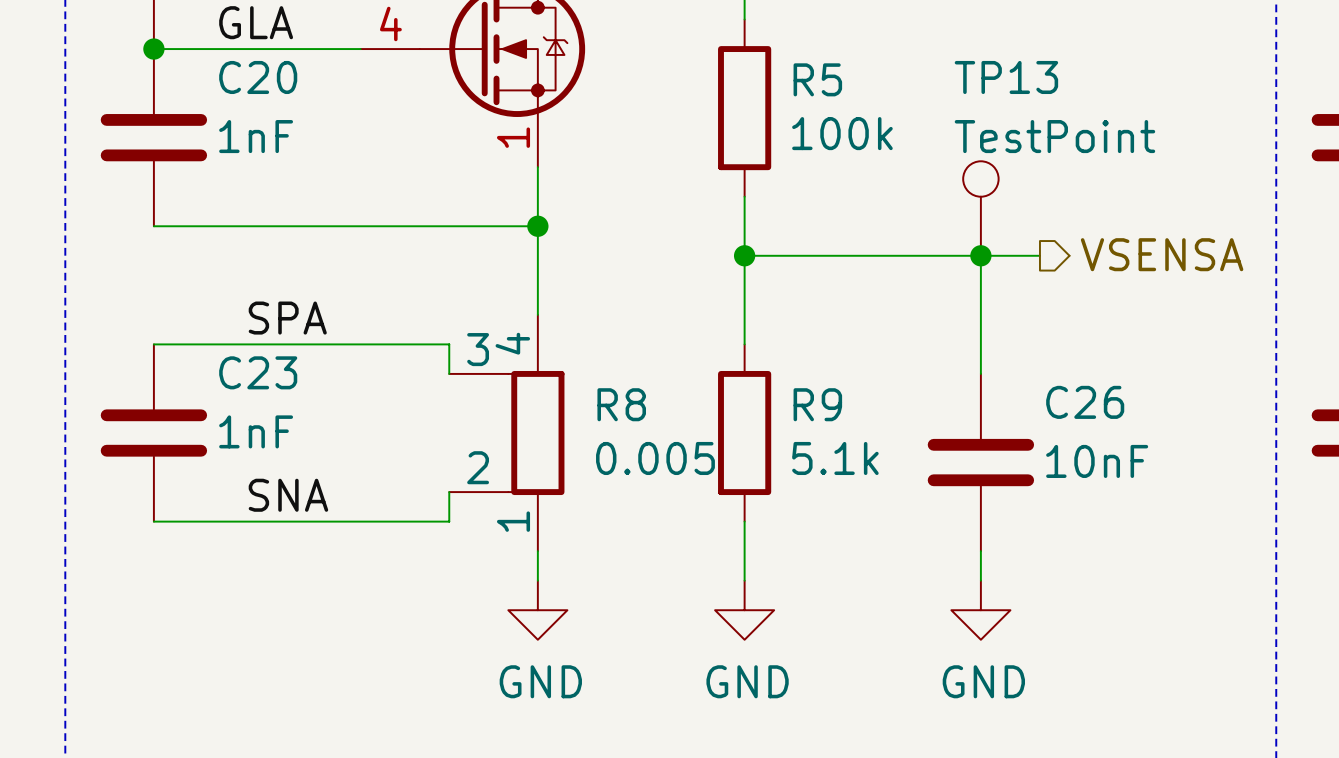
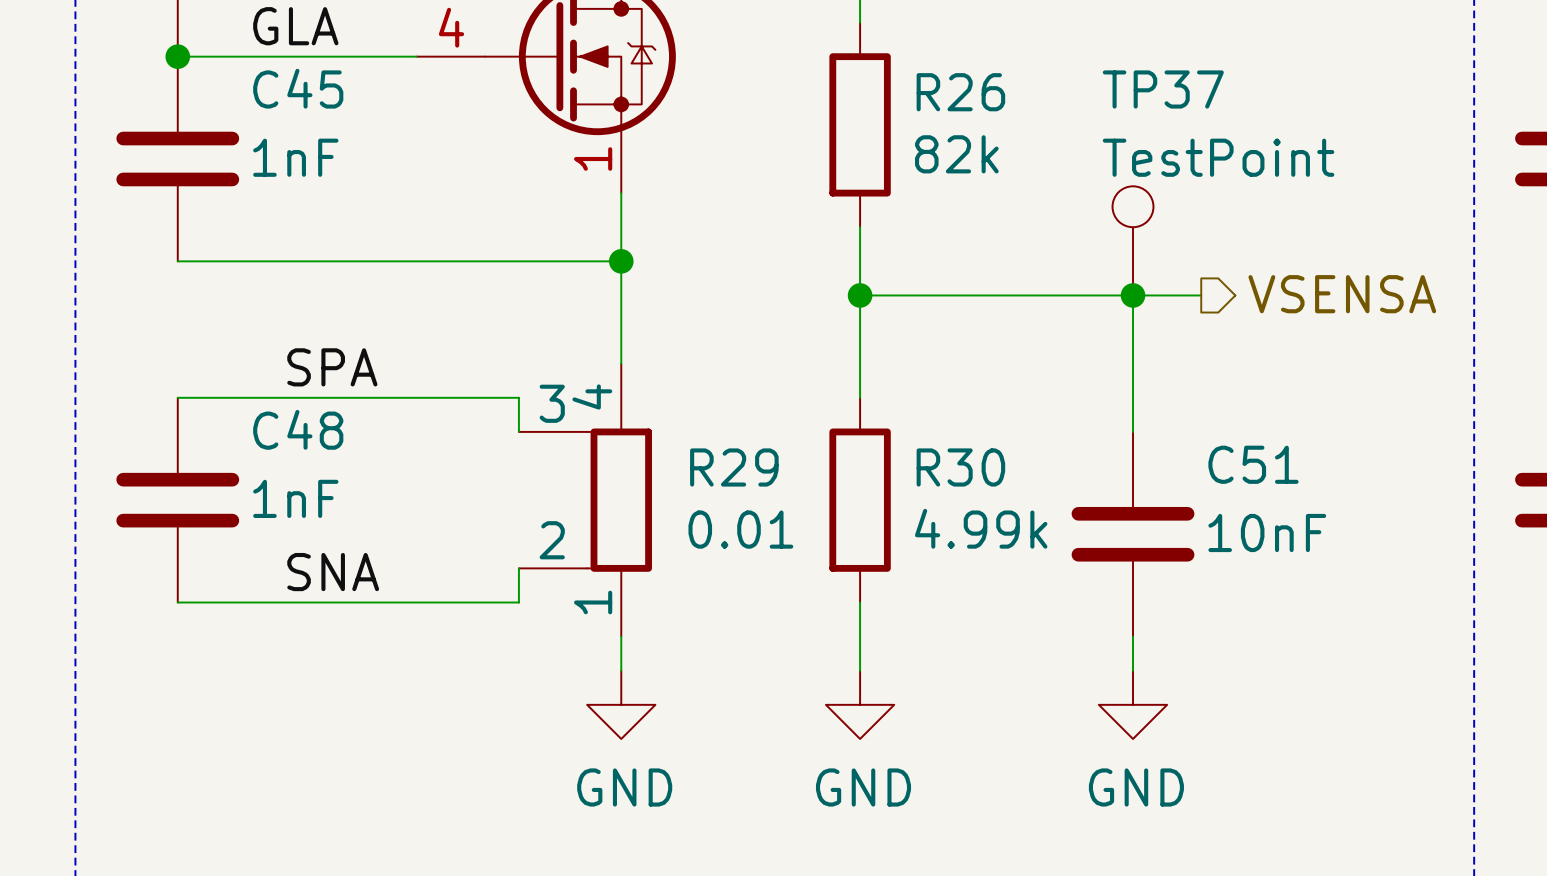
C20 name: C20 (258, 77) -> C45 (298, 88)
TP13 name: TP13 (1006, 77) -> TP37 (1163, 89)
R5 name: R5 (817, 79) -> R26 (960, 92)
R5 value: 100k (842, 133) -> 82k (956, 154)
C23 name: C23 (258, 372) -> C48 (298, 429)
C26 name: C26 (1085, 402) -> C51 (1253, 464)
R8 name: R8 (621, 404) -> R29 (734, 467)
R9 name: R9 (817, 404) -> R30 (960, 467)
R8 value: 0.005 (655, 458) -> 0.01 (740, 529)
R9 value: 5.1k (835, 458) -> 4.99k (981, 528)

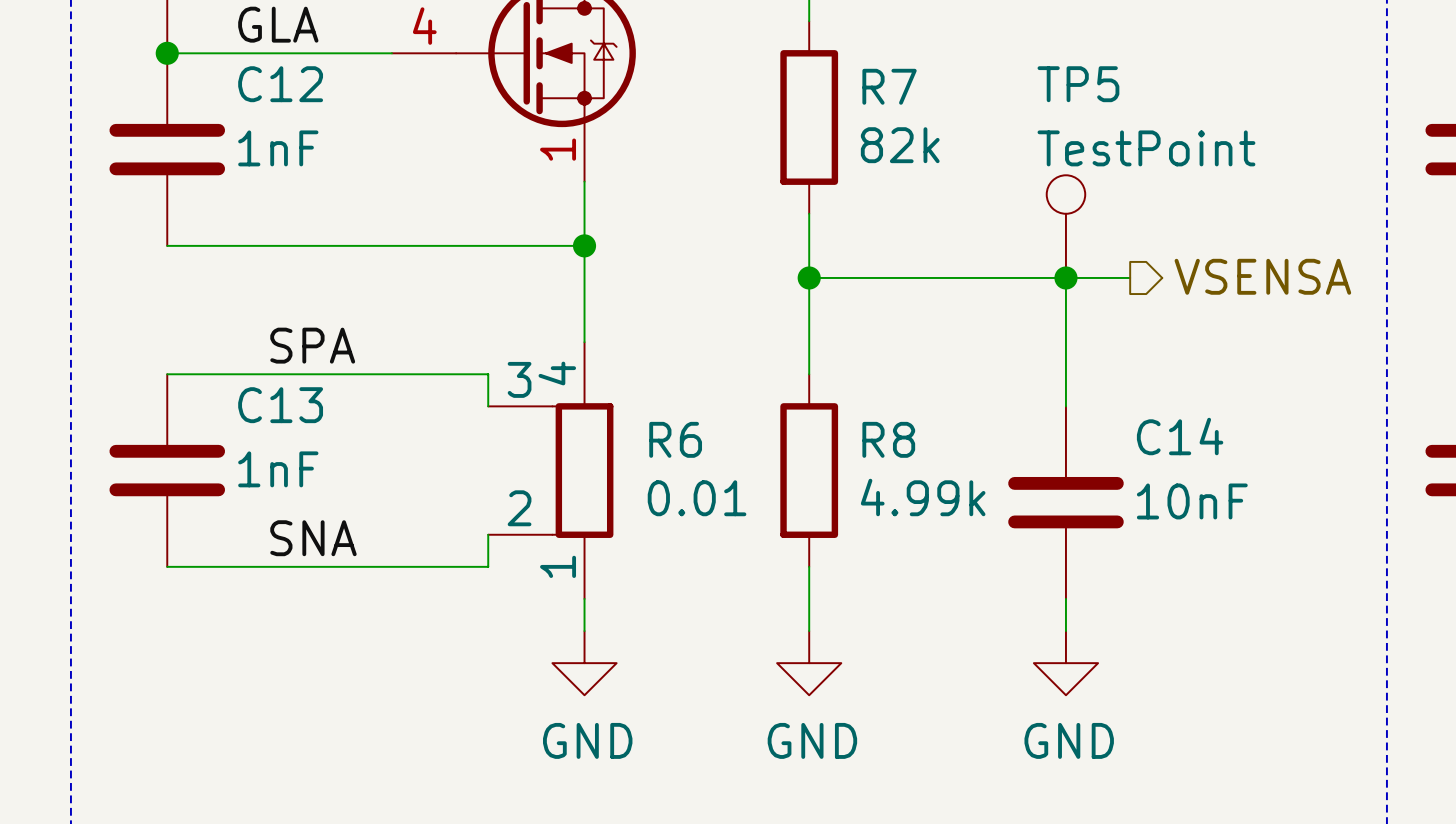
C45 name: C45 (298, 88) -> C12 (280, 84)
TP37 name: TP37 (1163, 89) -> TP5 (1078, 84)
R26 name: R26 (960, 92) -> R7 (889, 86)
C48 name: C48 (298, 429) -> C13 (280, 405)
C51 name: C51 (1253, 464) -> C14 (1180, 436)
R29 name: R29 (734, 467) -> R6 (675, 439)
R30 name: R30 (960, 467) -> R8 (888, 439)

